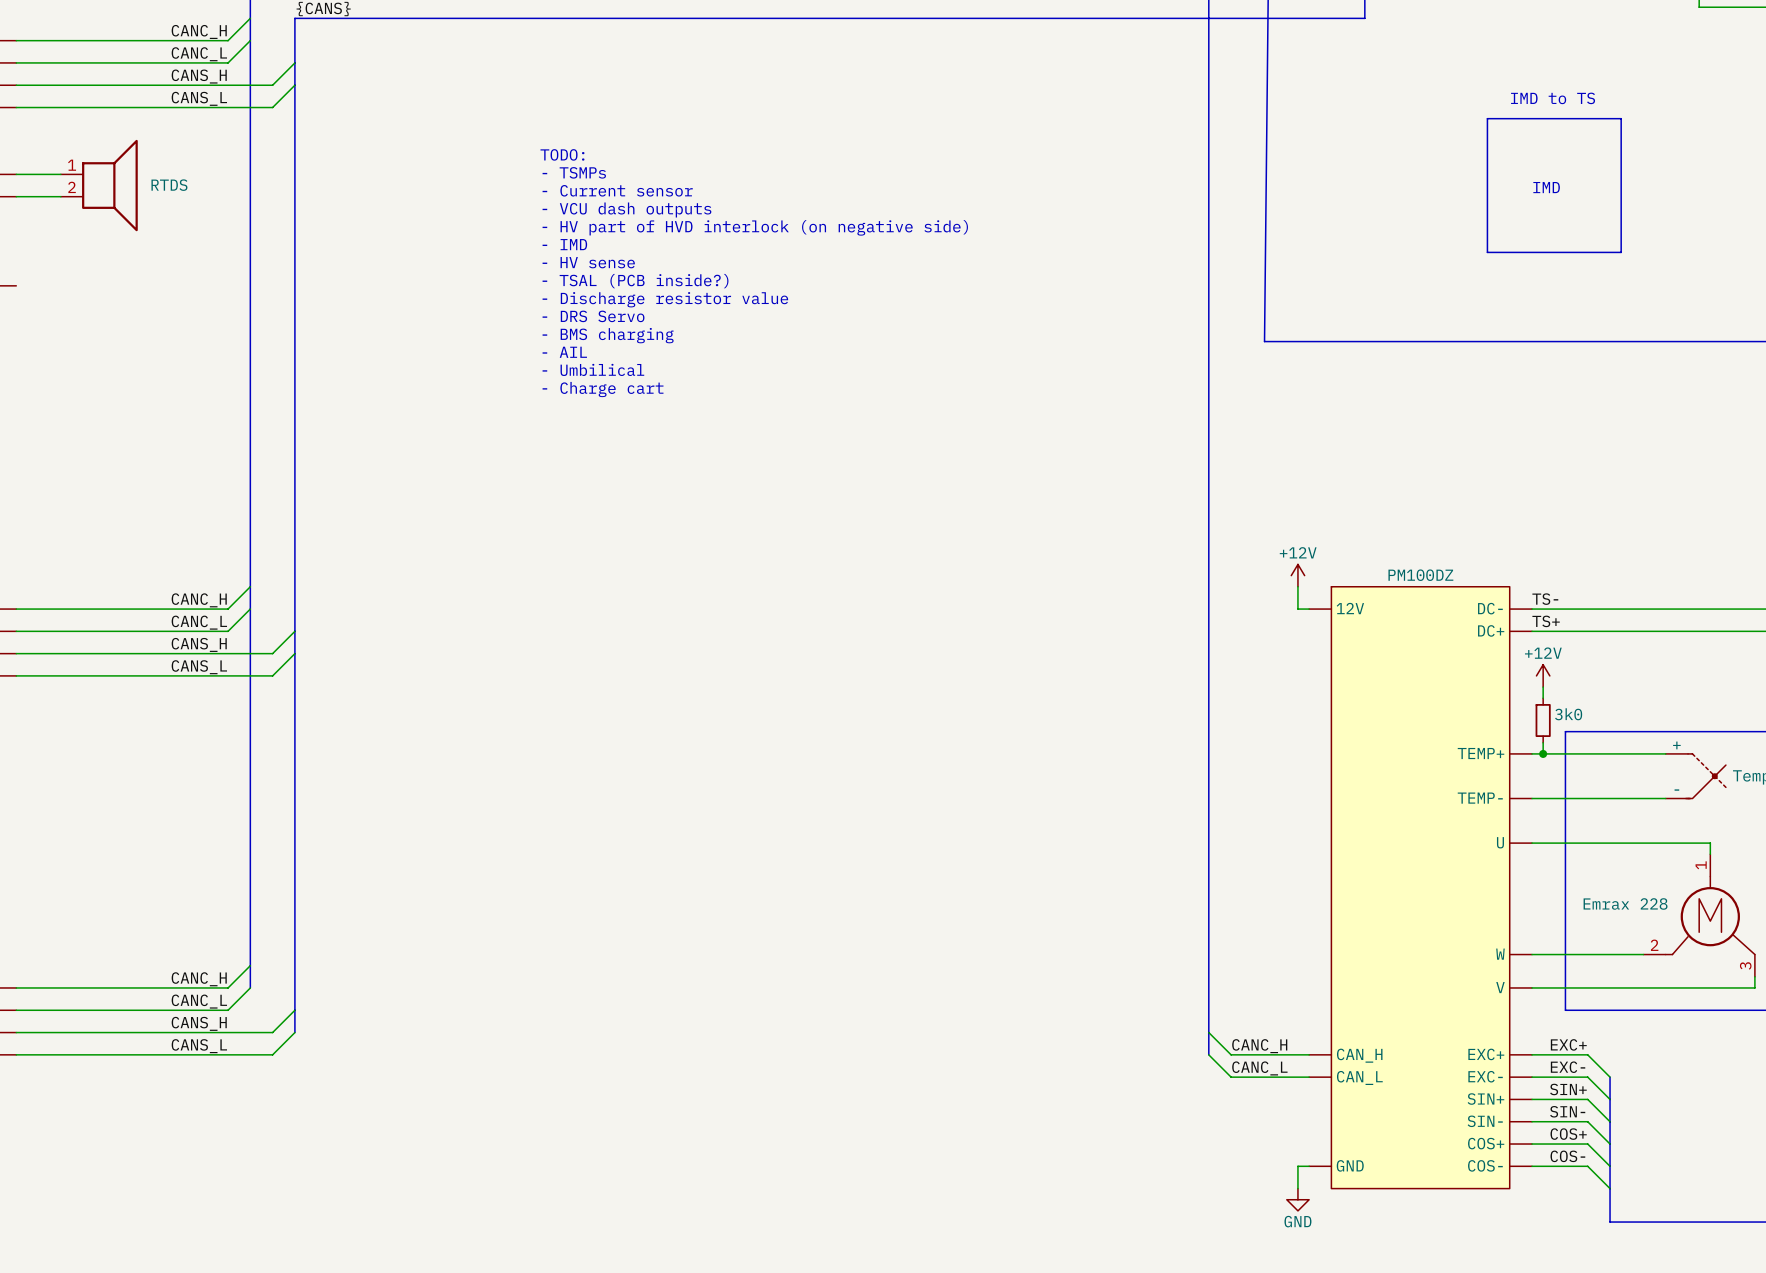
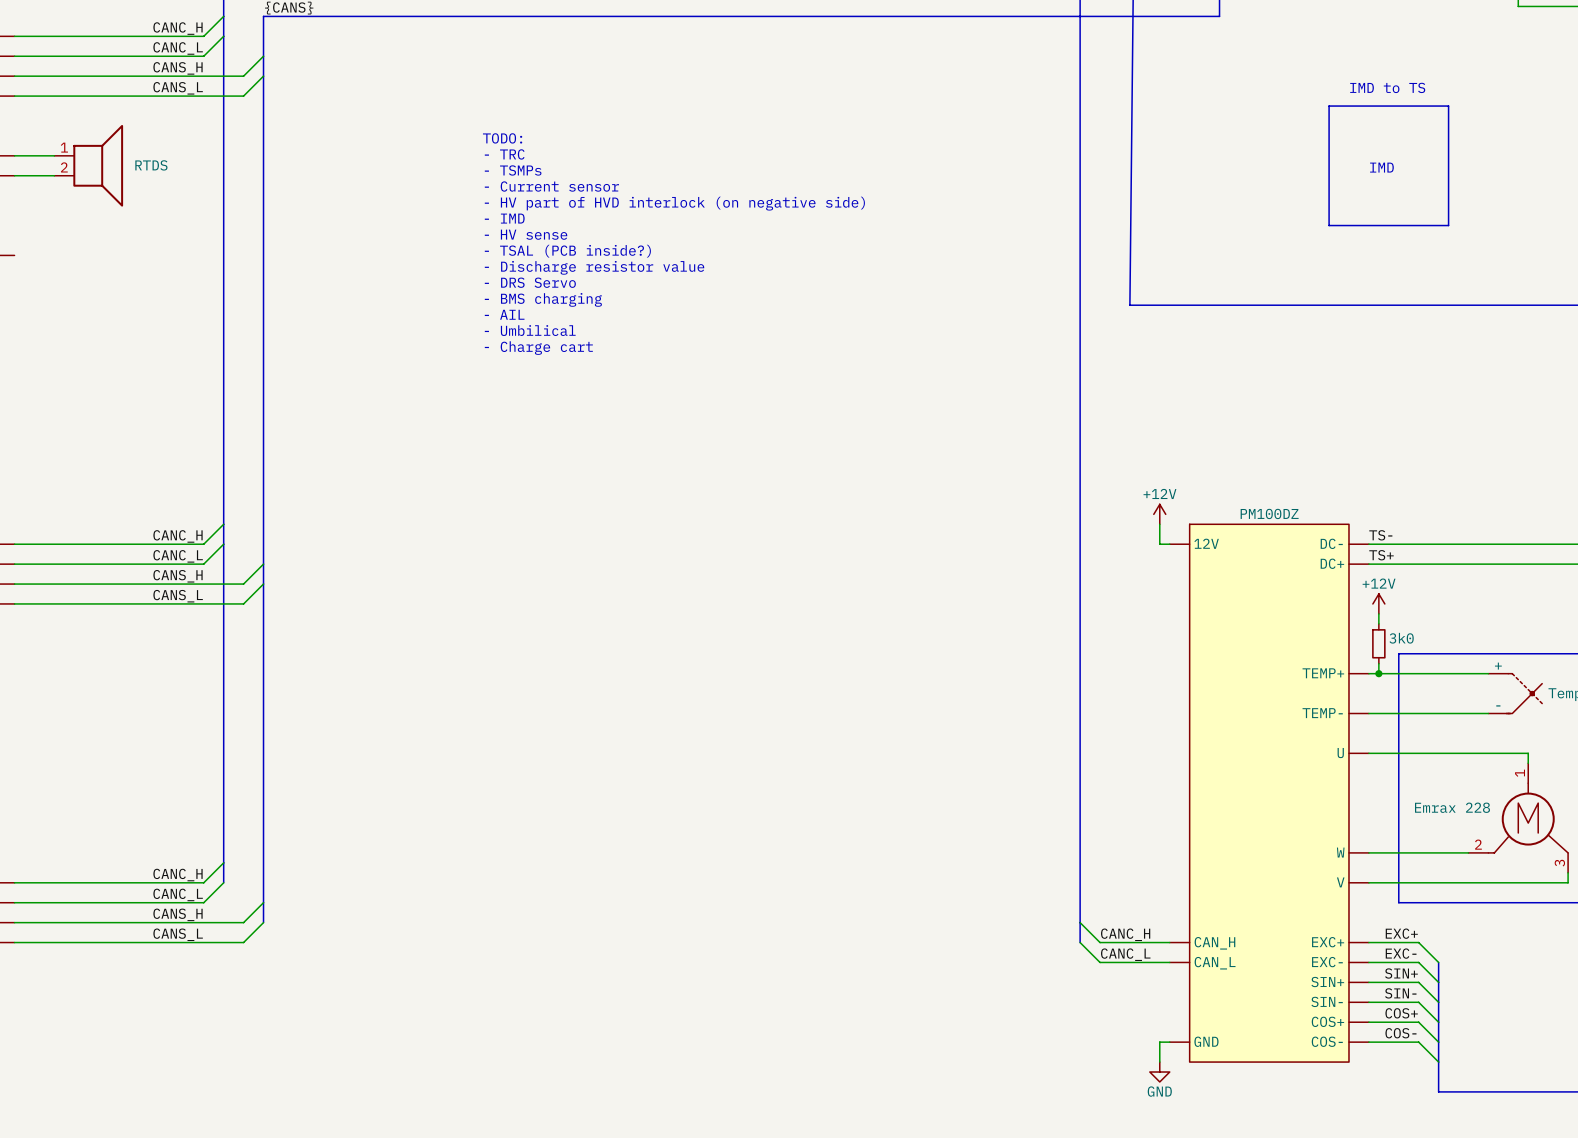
text: - TSMPs (574, 172) -> - TRC (504, 154)
text: - Current sensor (617, 190) -> - TSMPs (513, 170)
text: - VCU dash outputs (626, 209) -> - Current sensor (551, 186)

